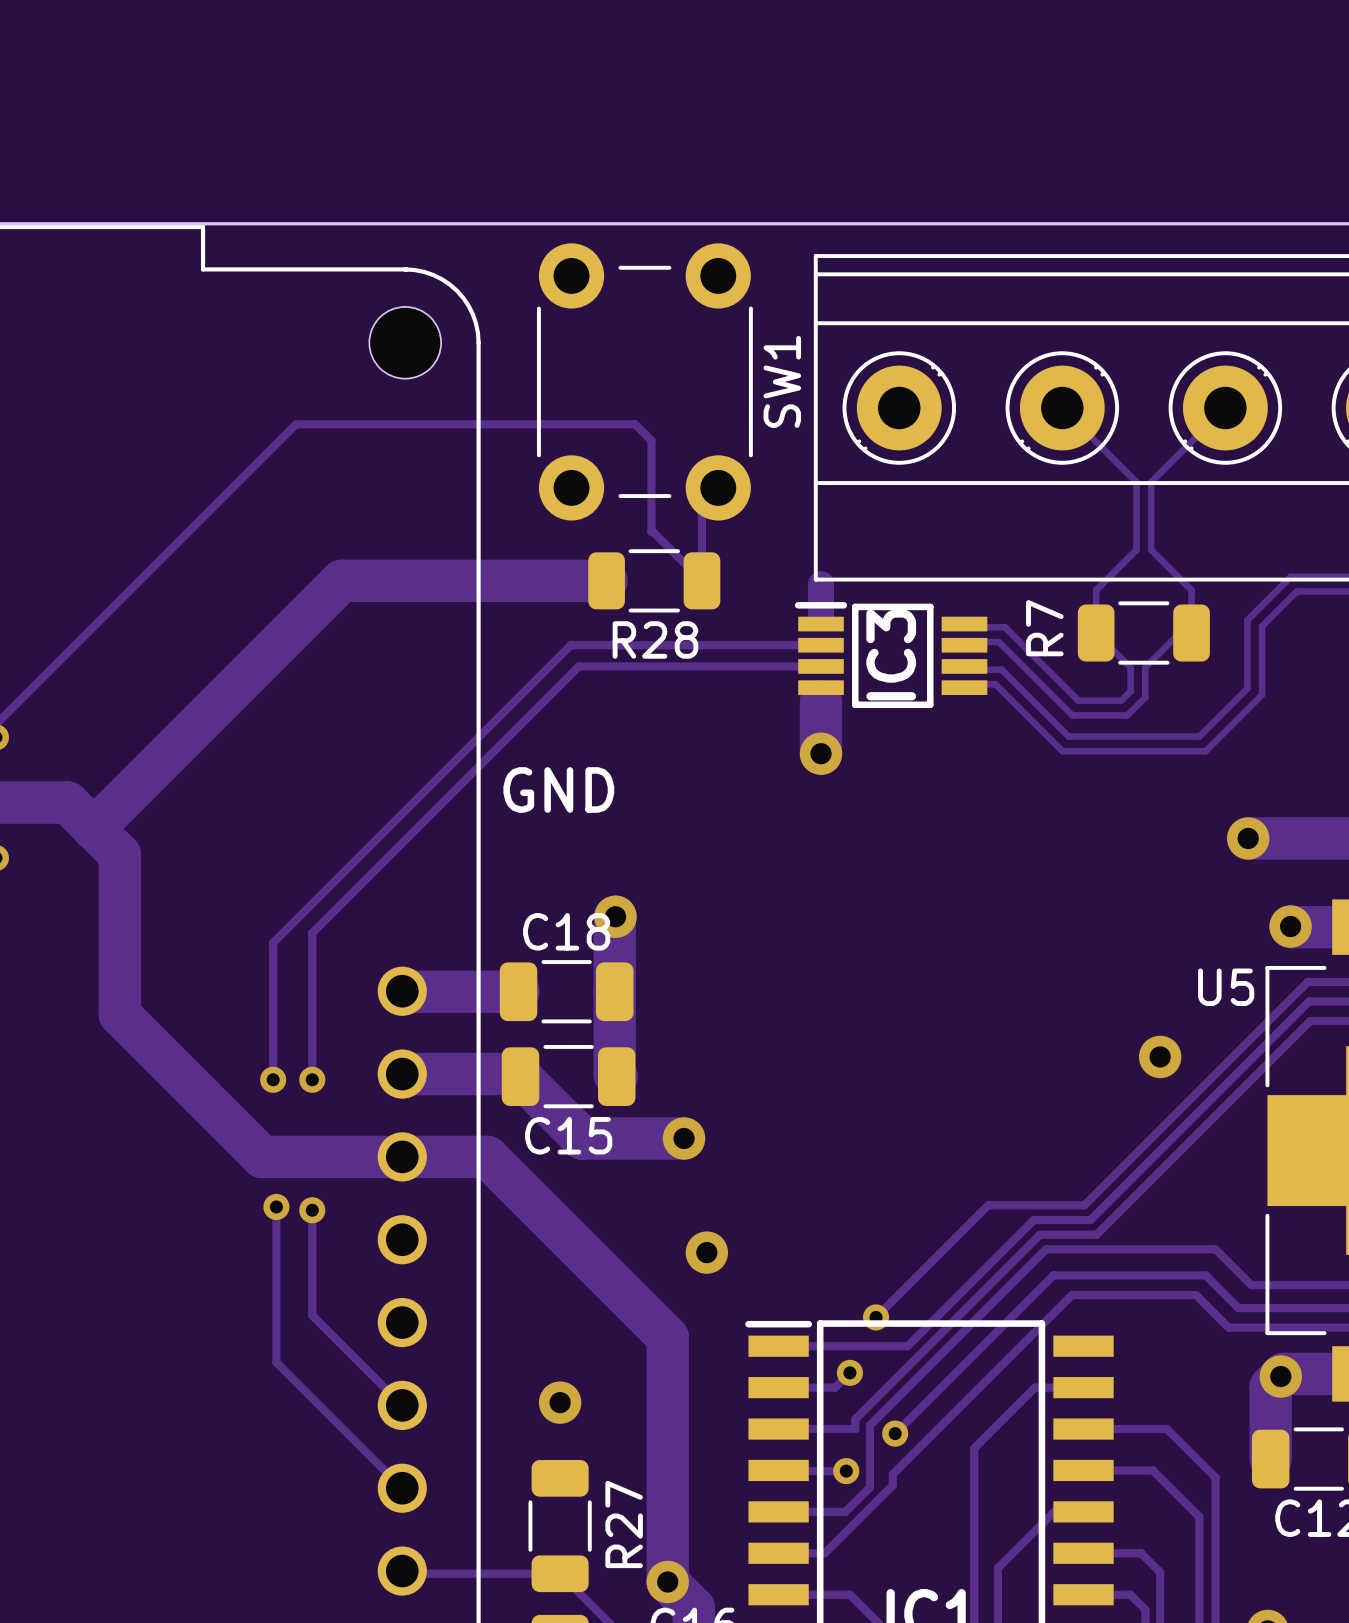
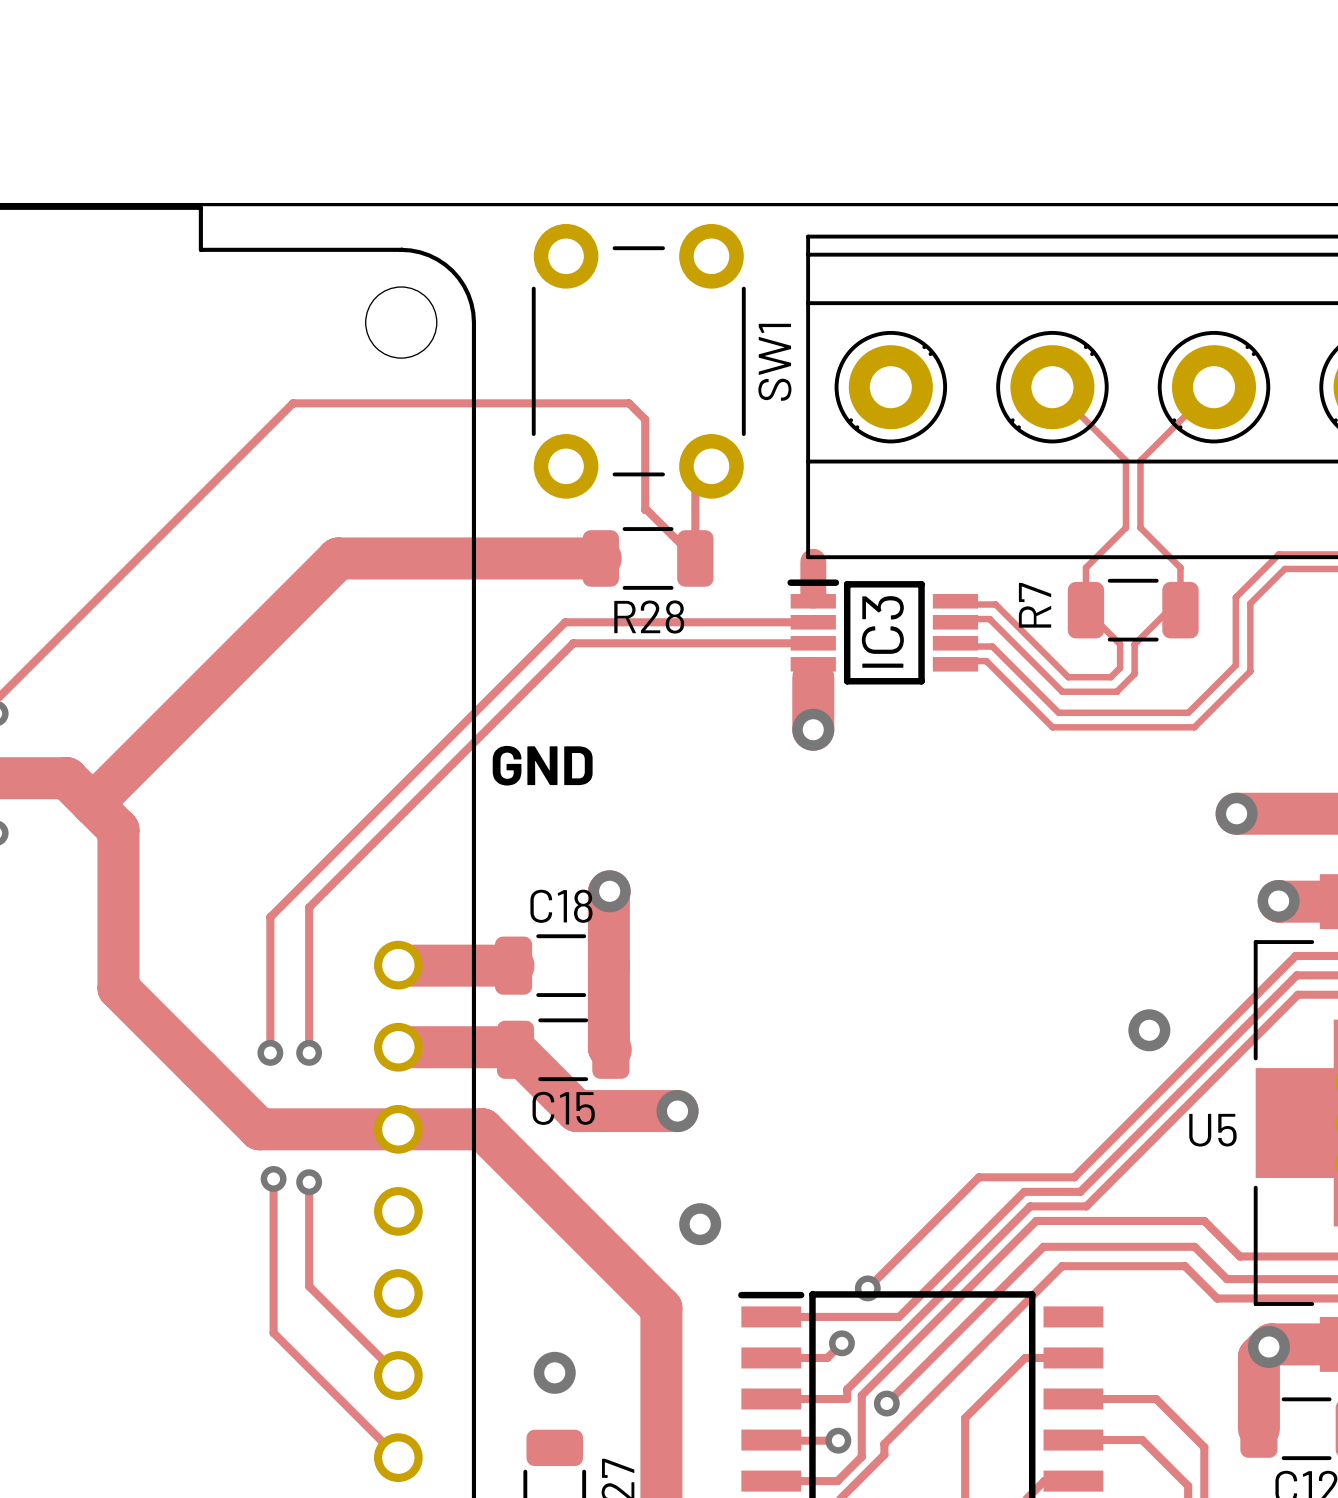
U5 name position: U5 (1226, 987) -> U5 (1212, 1130)

